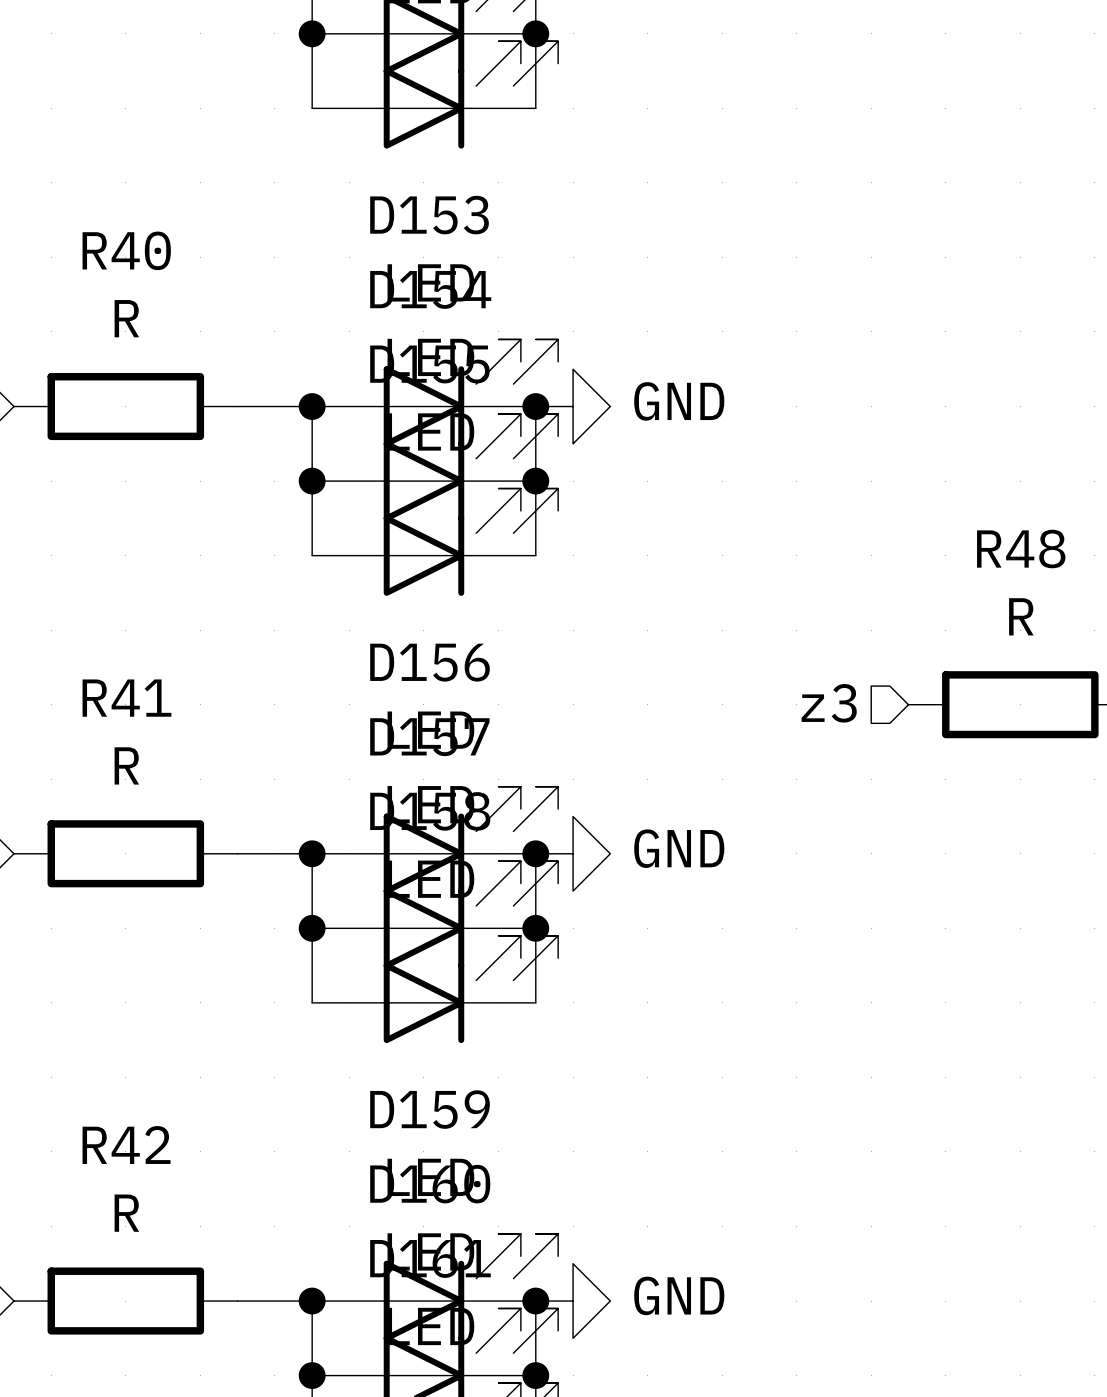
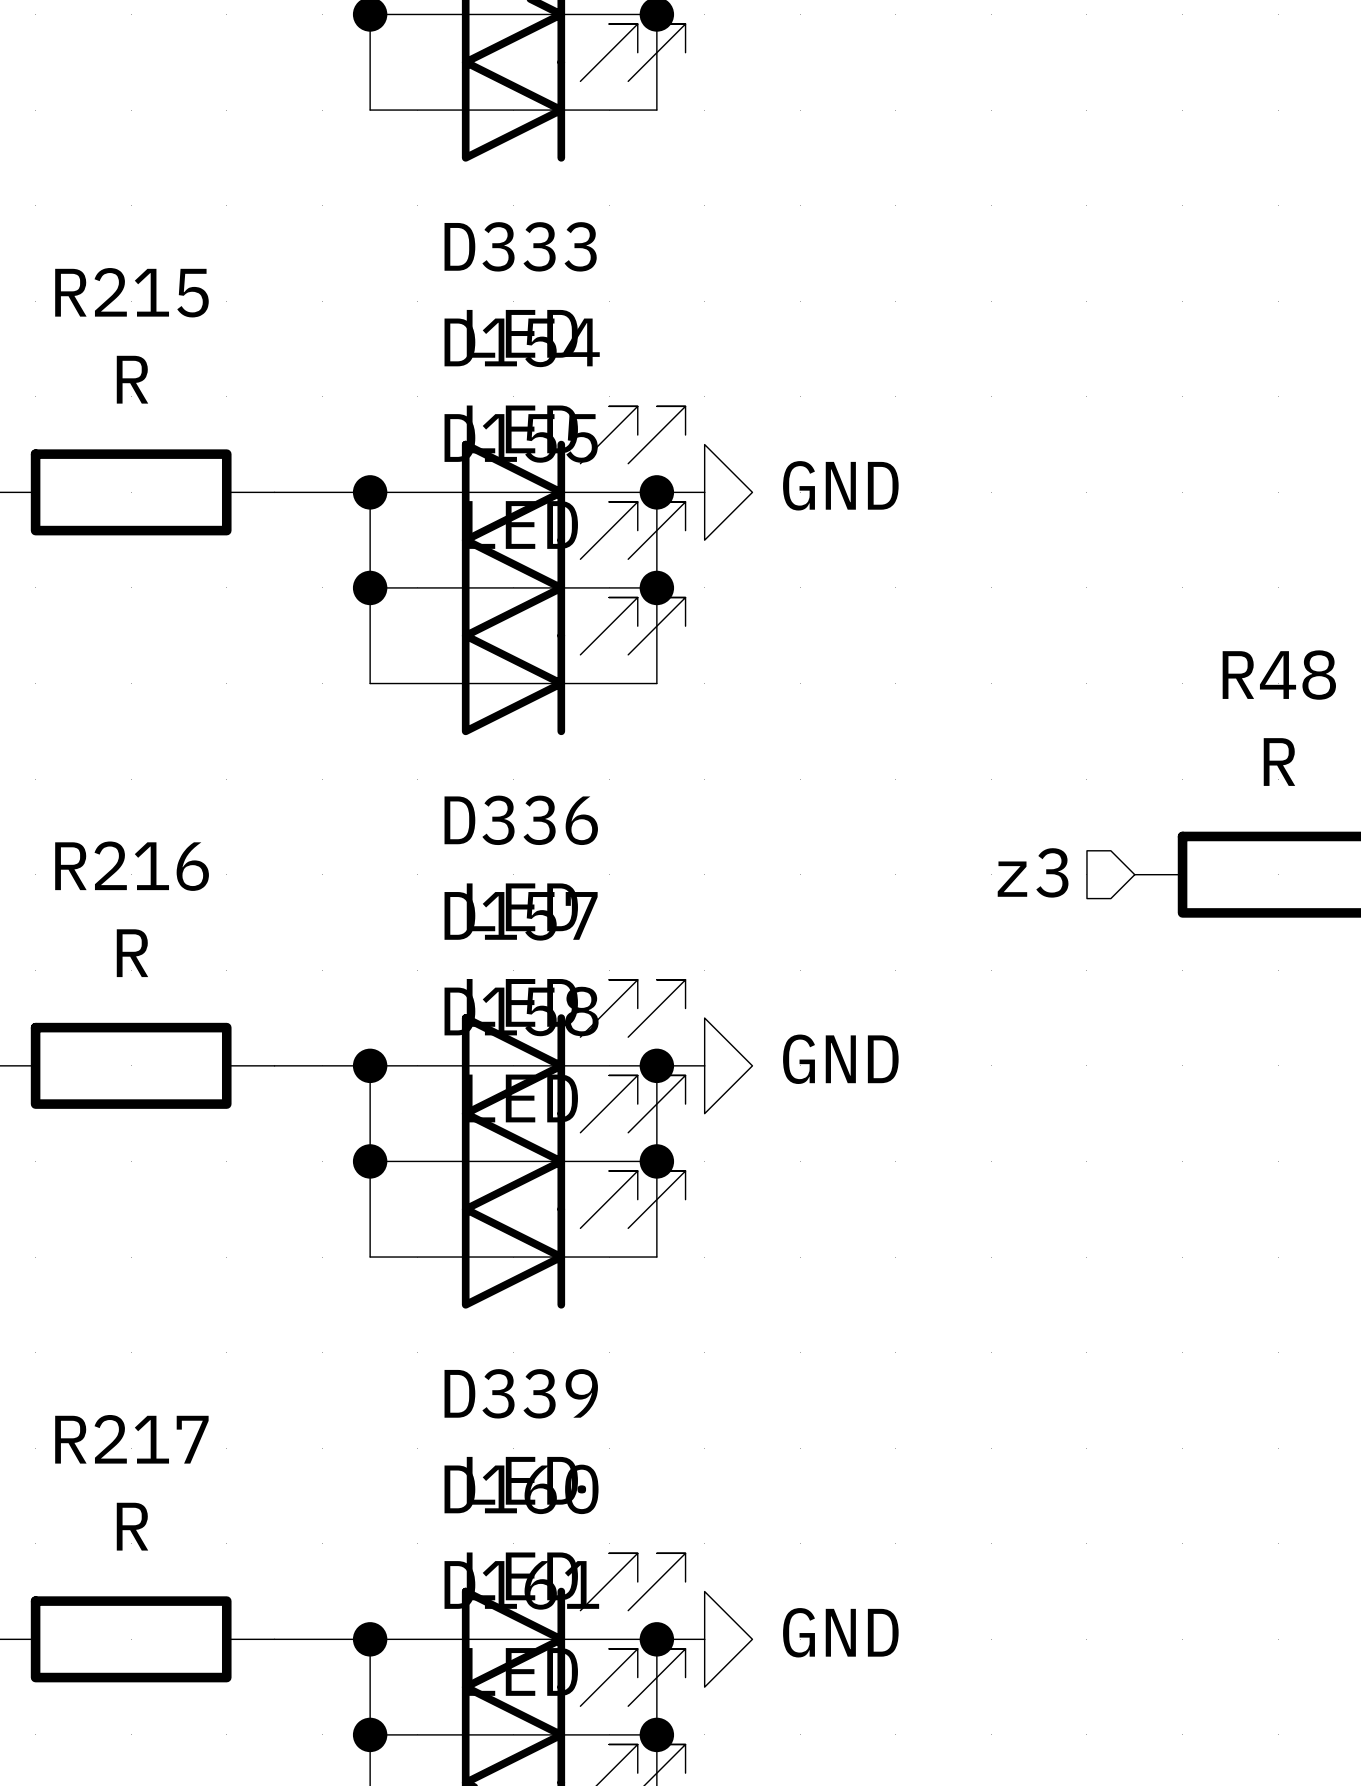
D153 name: D153 (429, 215) -> D333 (520, 246)
R40 name: R40 (126, 250) -> R215 (131, 292)
D156 name: D156 (430, 662) -> D336 (521, 820)
R41 name: R41 (126, 698) -> R216 (132, 866)
D159 name: D159 (430, 1109) -> D339 (521, 1393)
R42 name: R42 (126, 1145) -> R217 (131, 1439)

